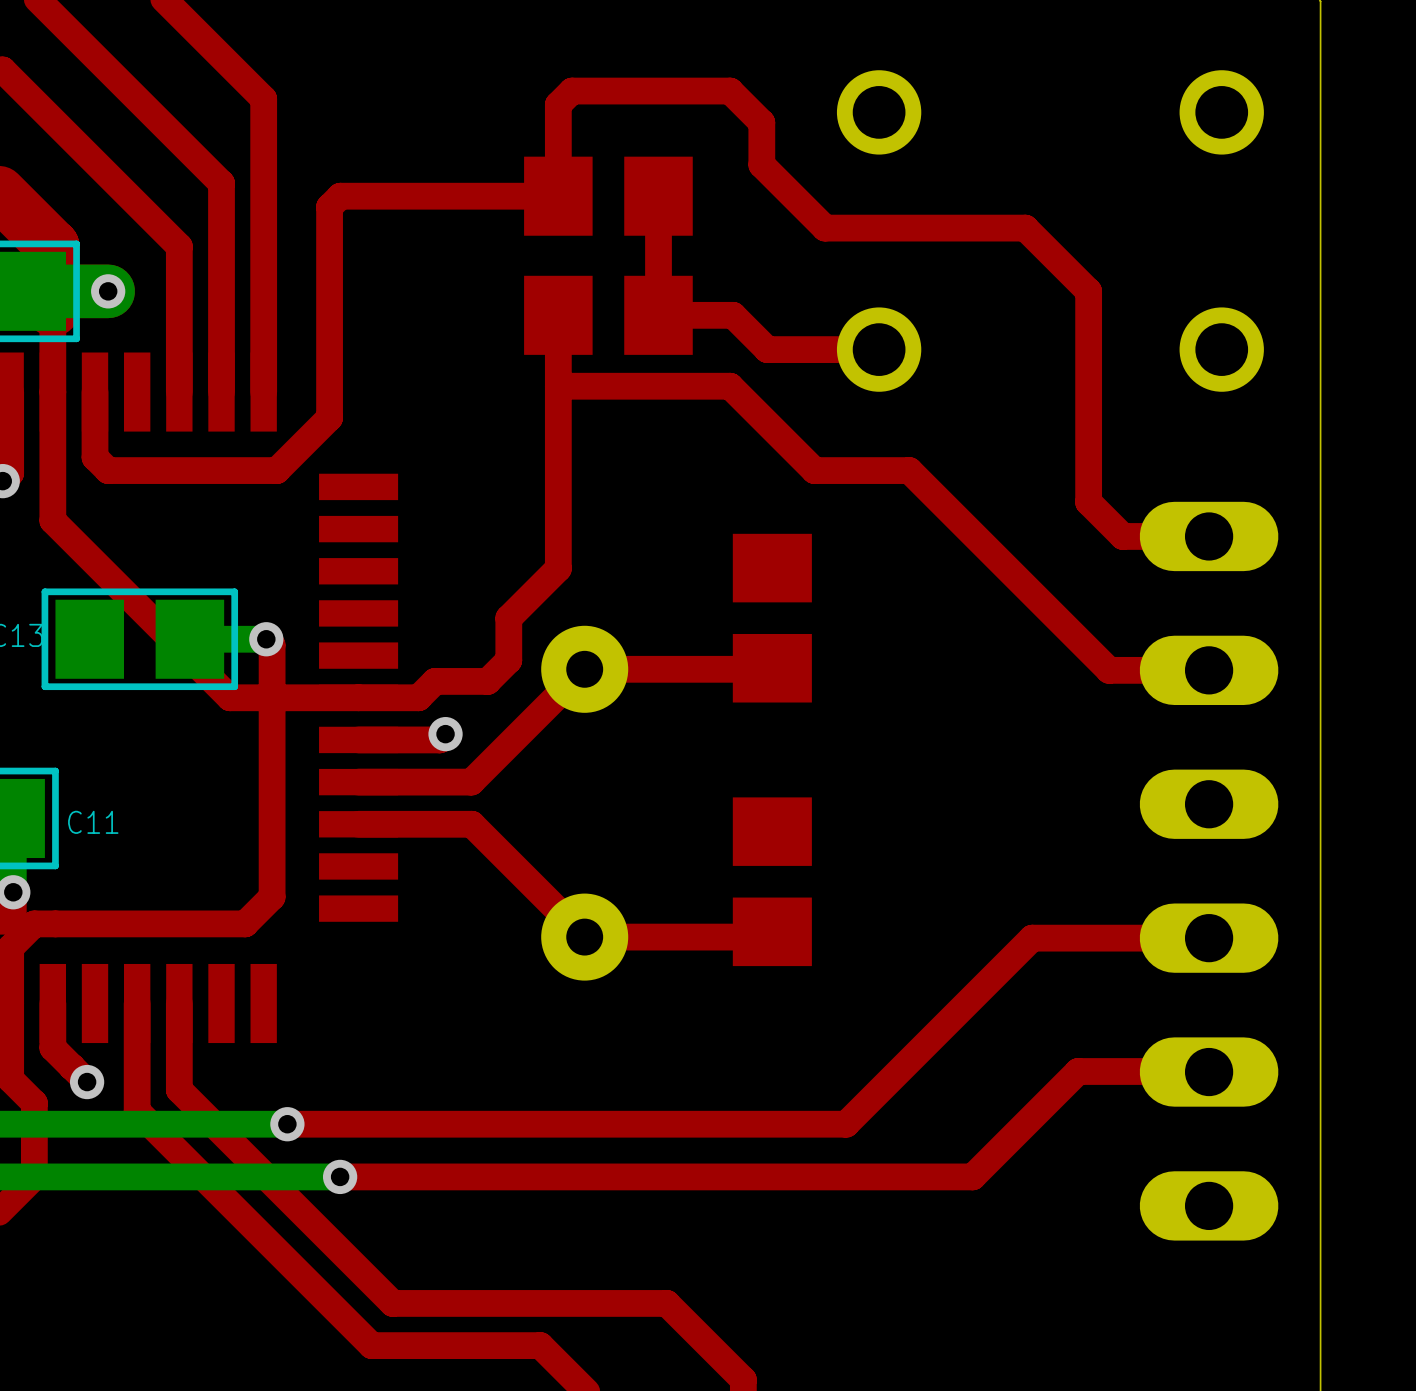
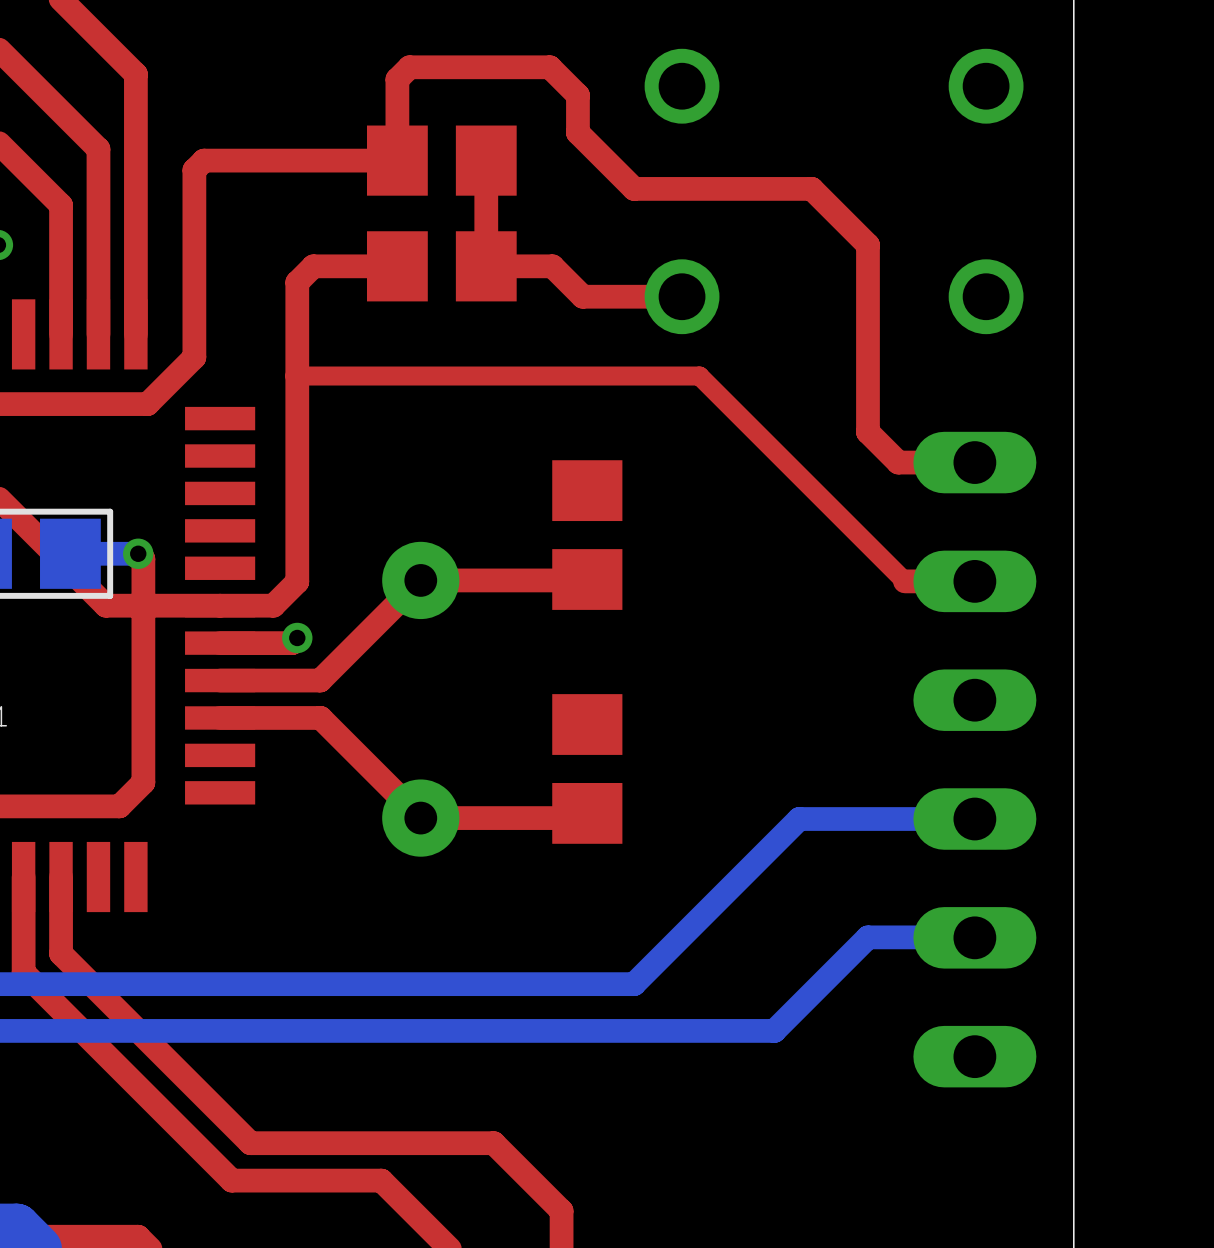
top track: (558, 315) (558, 568) (508, 618) (508, 660) (487, 681) (435, 681) -> (397, 266) (313, 266) (297, 282) (297, 581) (287, 591)
top track: (558, 386) (730, 386) (814, 470) (909, 470) (1109, 670) (1130, 670) -> (297, 376) (699, 376) (904, 581)
top track: (1209, 938) (1032, 938) (846, 1124) (287, 1124) -> none
bottom track: none -> (974, 819) (799, 819) (634, 984) (156, 984)
top track: (1208, 1071) (1078, 1071) (972, 1176) (340, 1176) -> none
bottom track: none -> (974, 937) (867, 937) (774, 1030) (203, 1030)
via: (287, 1124) -> none
via: (340, 1176) -> none

